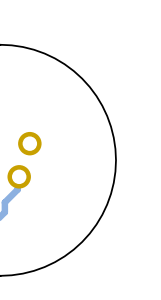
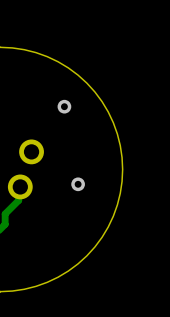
via: none -> (64, 106)
via: none -> (78, 184)

